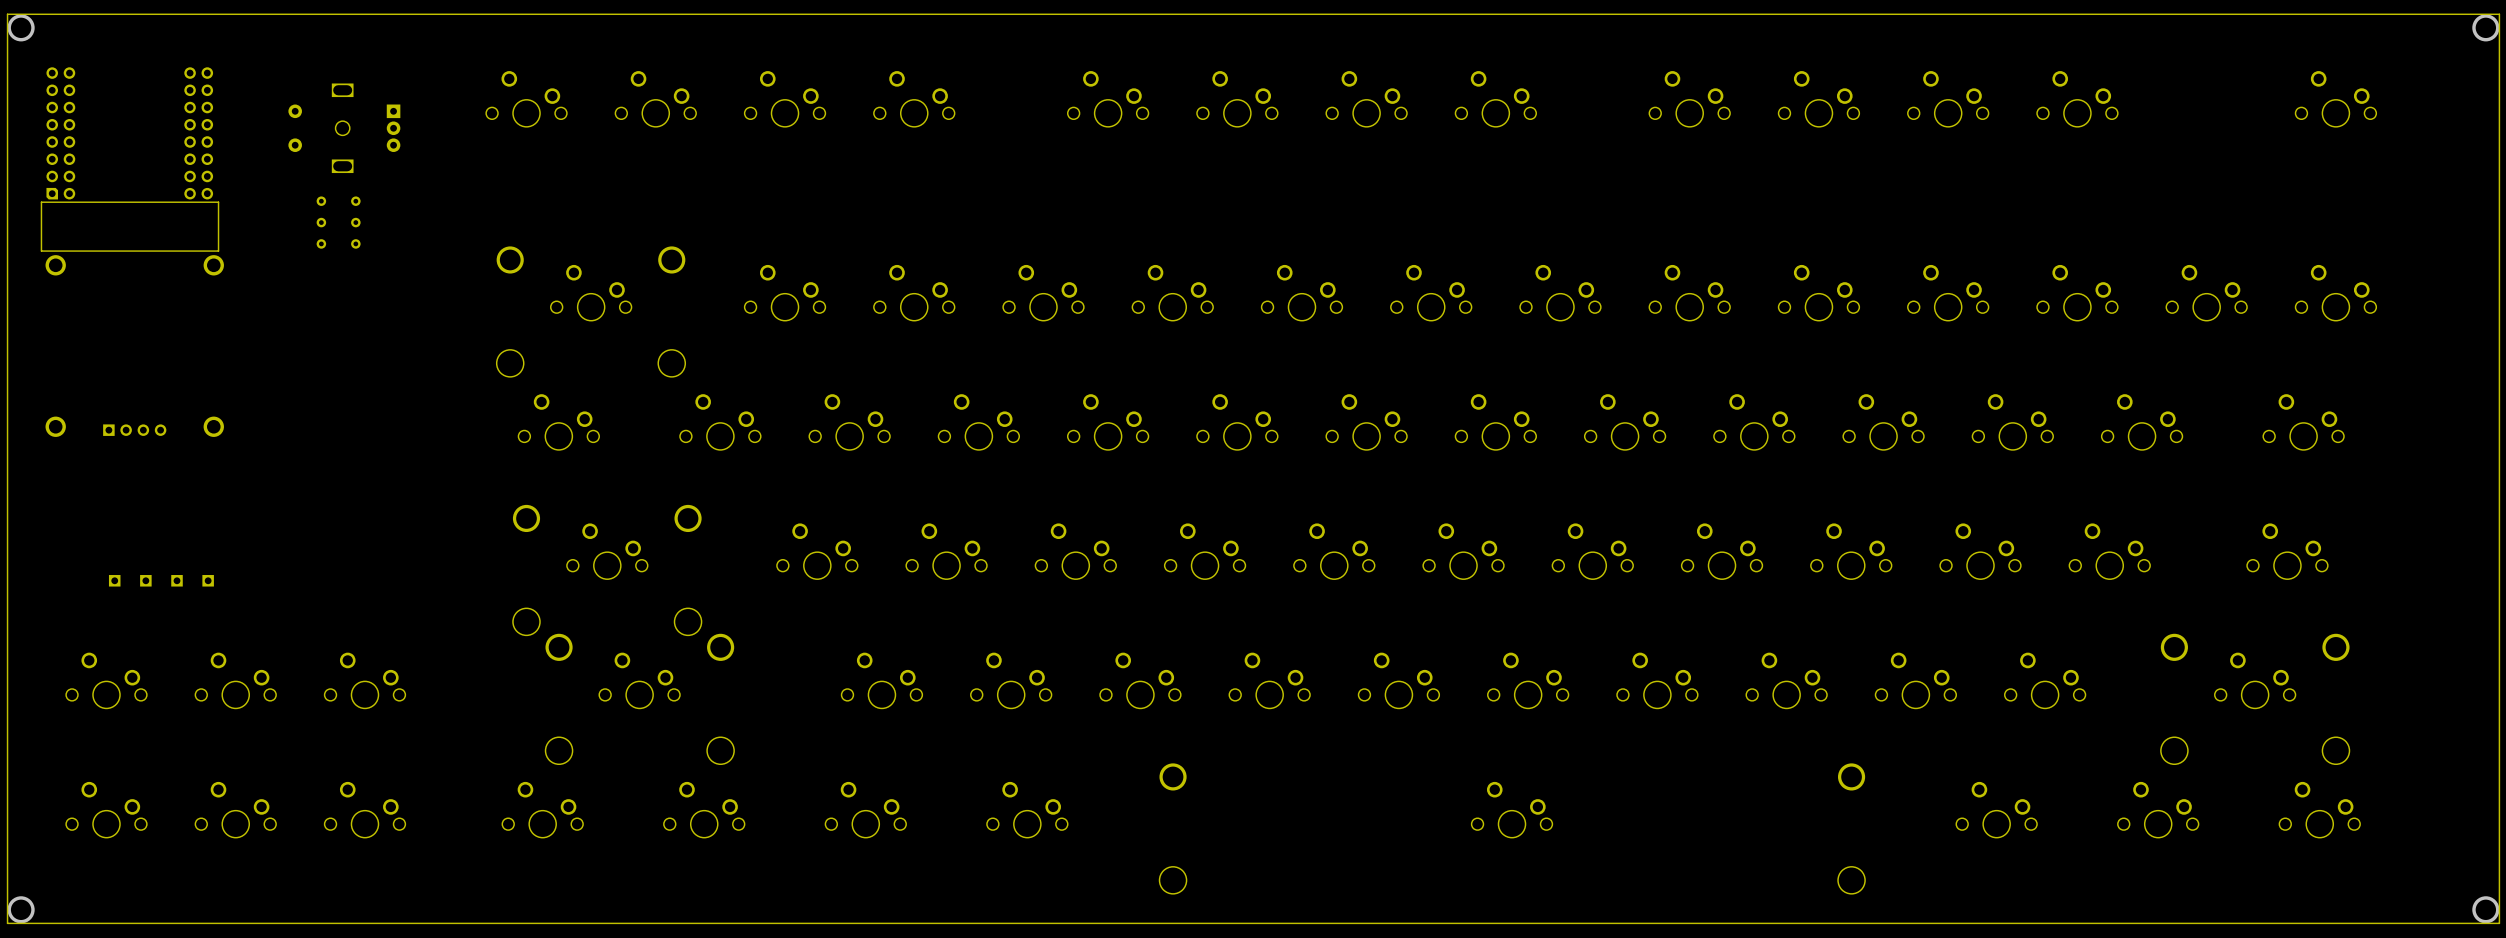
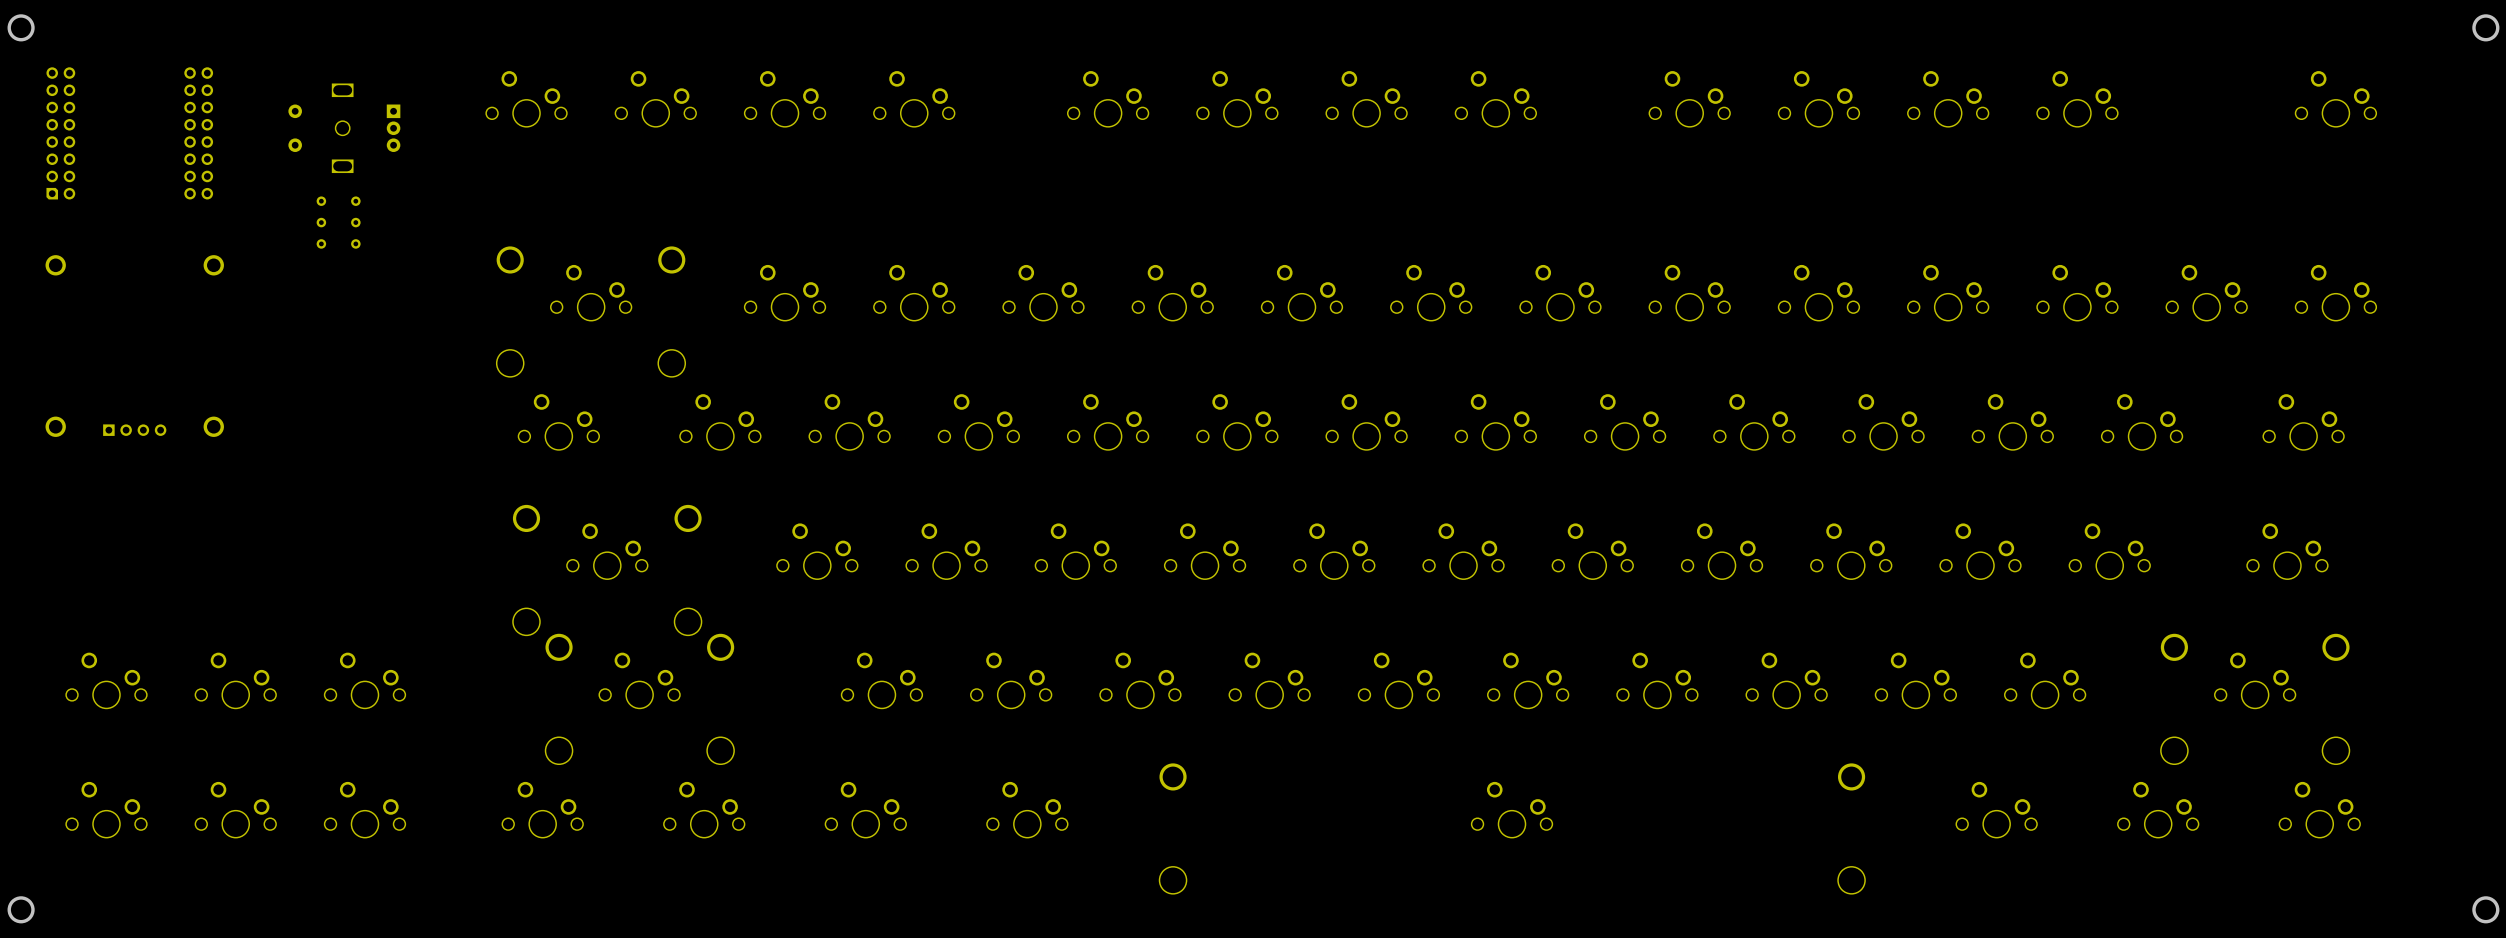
board edge: (2499, 14) (7, 14) (7, 923) (2499, 923) (2499, 14) -> none
board edge: (218, 202) (41, 202) (41, 251) (218, 251) (218, 202) -> none
part: (114, 580) -> none
part: (145, 580) -> none
part: (177, 580) -> none
part: (208, 580) -> none

